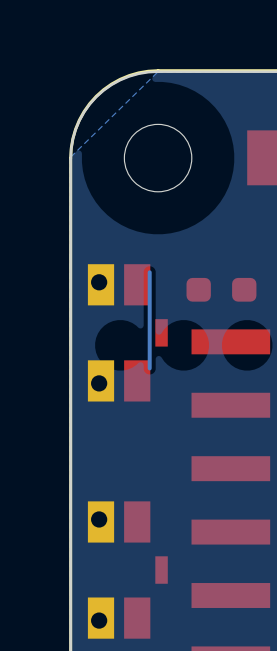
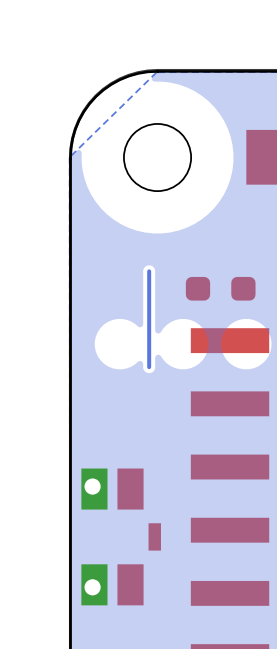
part: (127, 332) -> none
part position: (127, 570) -> (121, 536)

